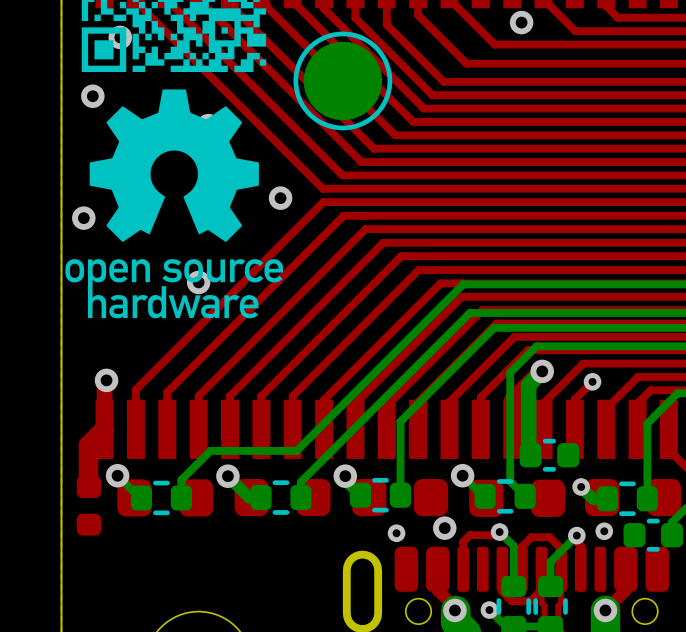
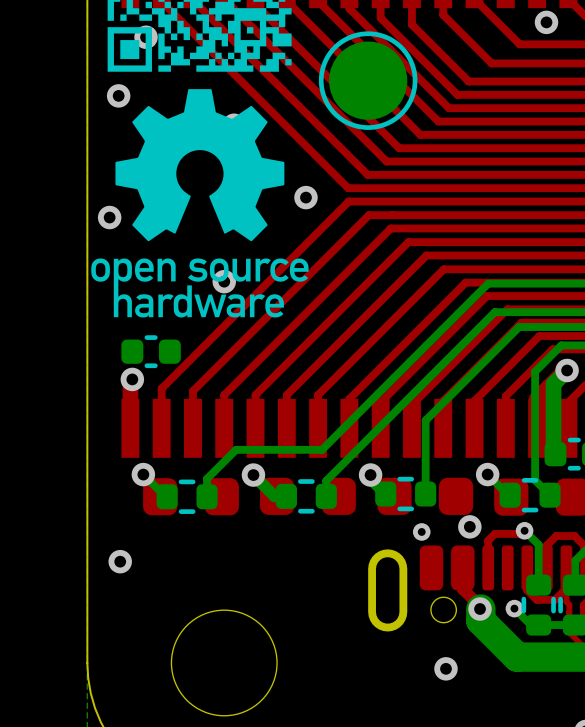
top track: (104, 429) (88, 445) (88, 486) -> none
part side: top (88, 505) -> bottom (151, 351)
via: none -> (120, 561)

